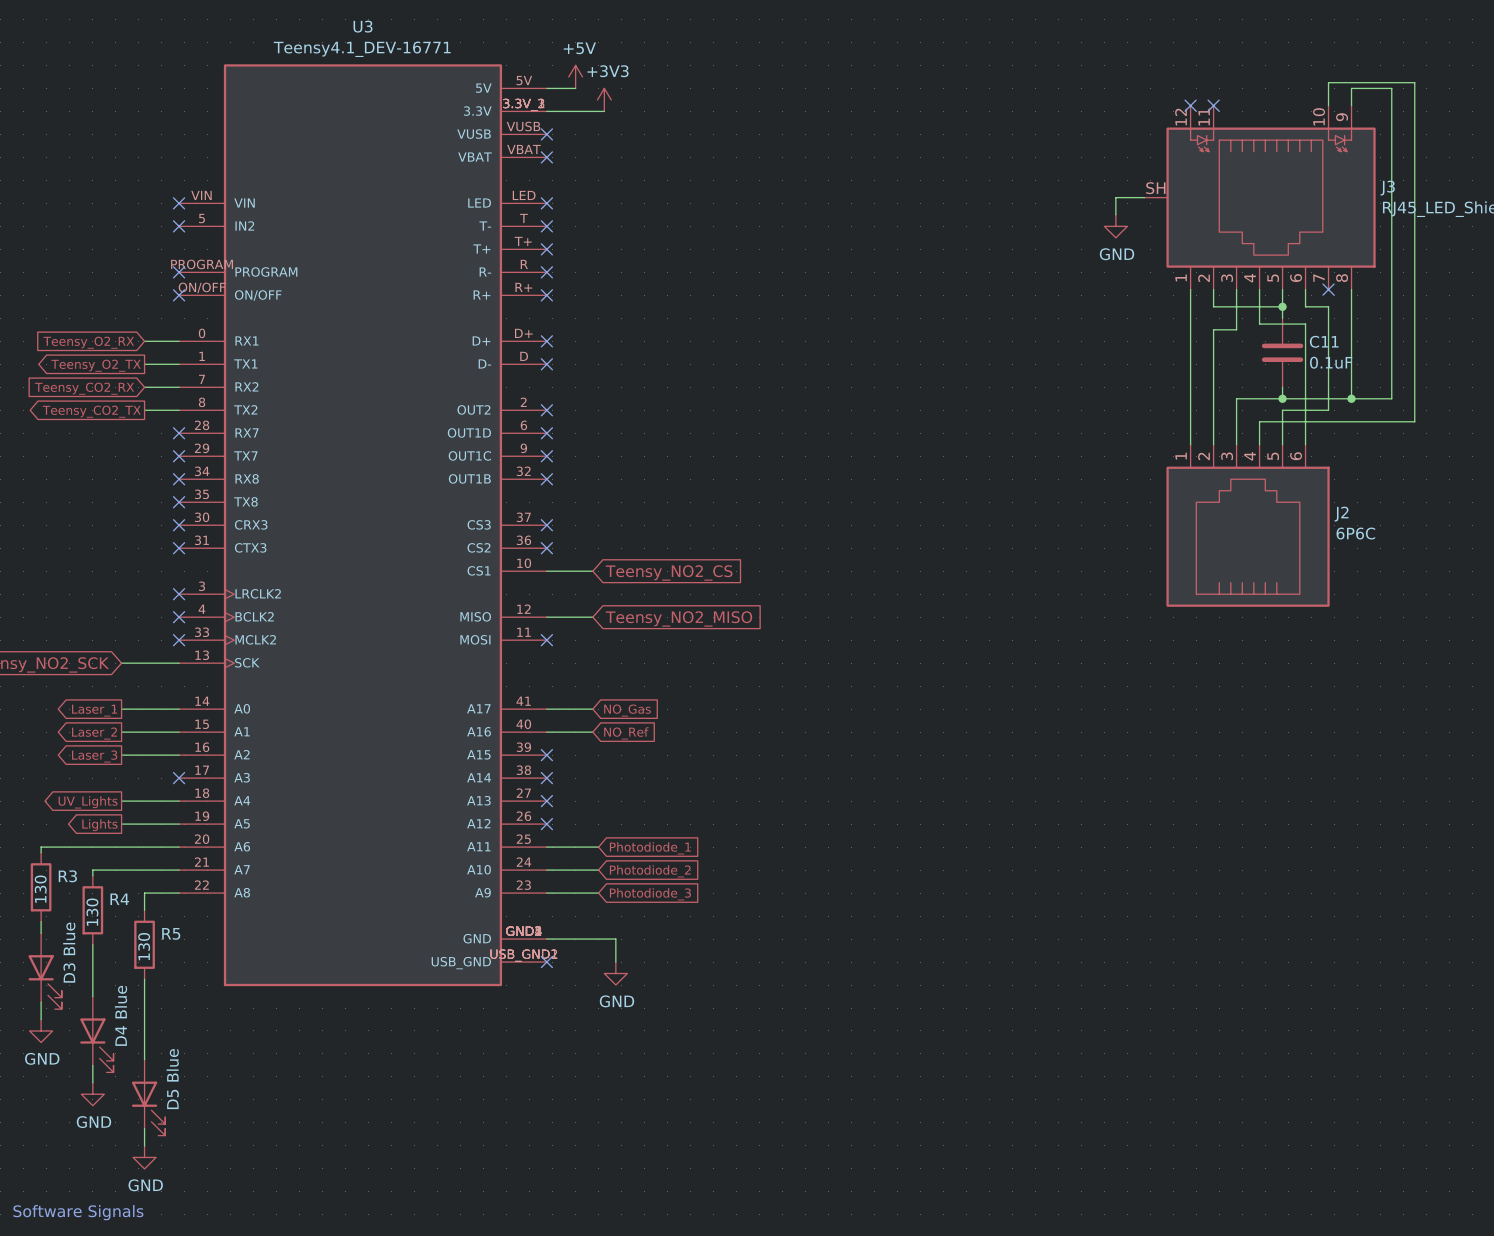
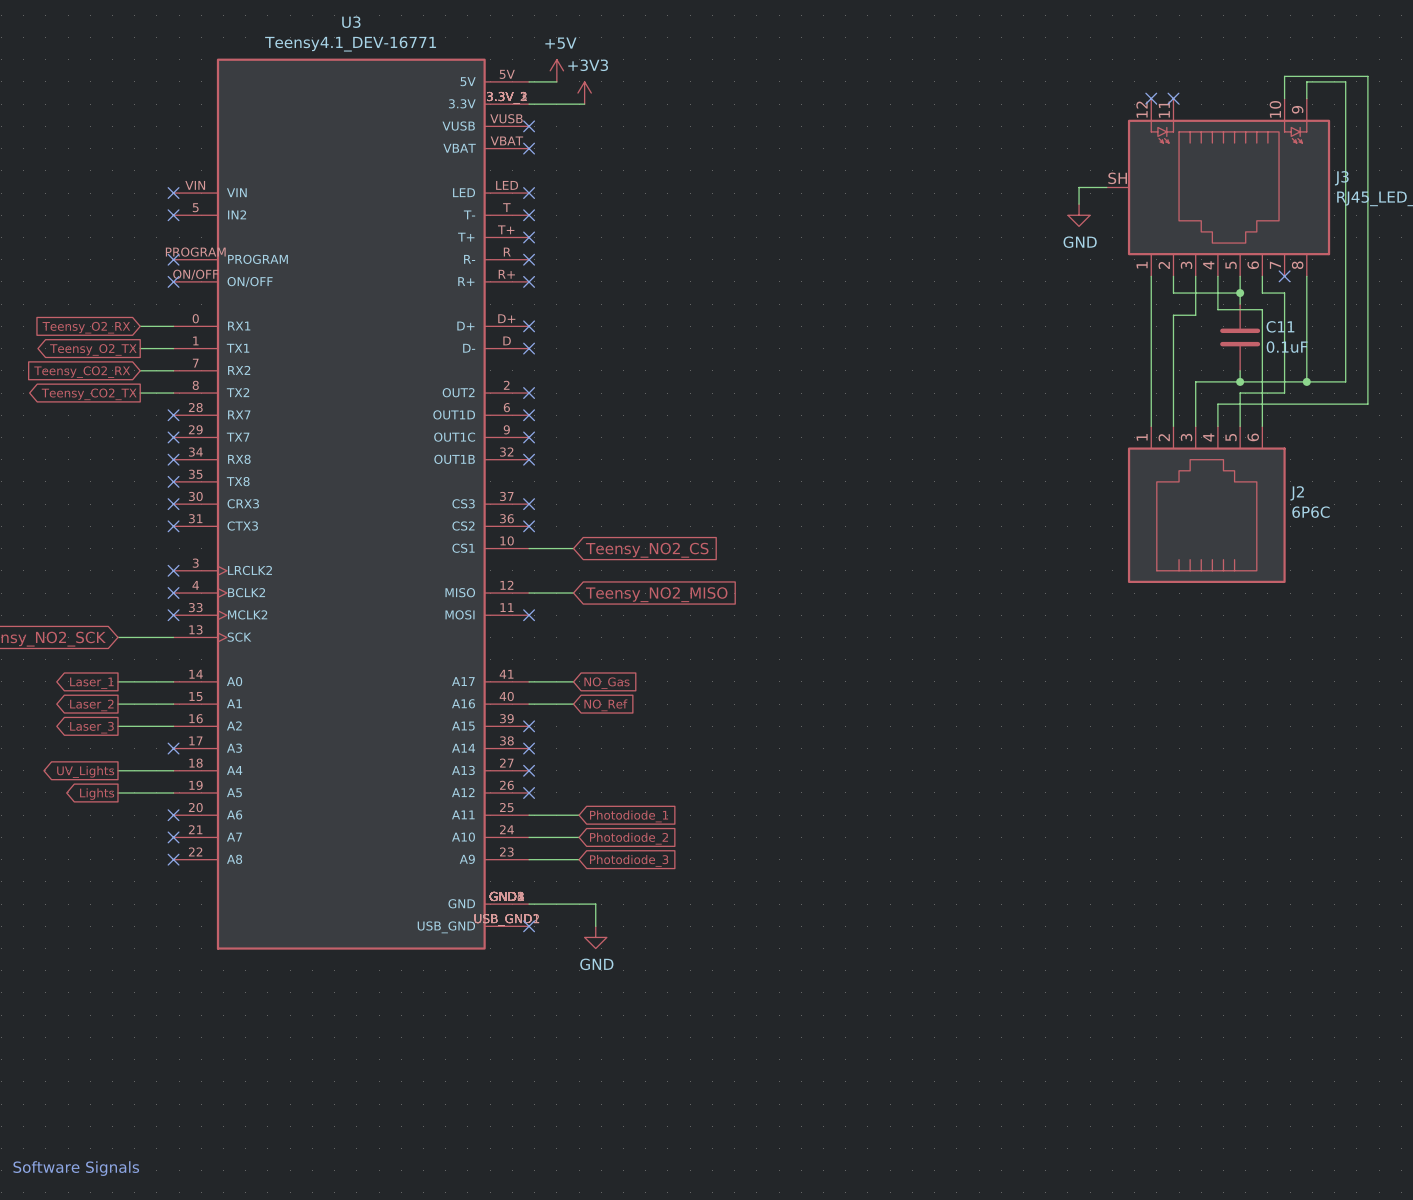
wire: (179, 847) (41, 847) (41, 852) -> none
no-connect mark: none -> (173, 815)
wire: (179, 870) (92, 870) (92, 875) -> none
no-connect mark: none -> (173, 837)
R3: 130 (41, 887) -> none
wire: (179, 893) (144, 893) (144, 910) -> none
no-connect mark: none -> (173, 859)
R4: 130 (92, 910) -> none
wire: (41, 921) (41, 933) -> none
wire: (92, 944) (92, 996) -> none
R5: 130 (144, 944) -> none
D3: Blue (45, 971) -> none
wire: (144, 979) (144, 1059) -> none
wire: (41, 1002) (41, 1019) -> none
power symbol: GND (41, 1030) -> none
D4: Blue (96, 1034) -> none
wire: (92, 1065) (92, 1082) -> none
power symbol: GND (92, 1094) -> none
D5: Blue (148, 1097) -> none
wire: (144, 1128) (144, 1145) -> none
power symbol: GND (144, 1157) -> none

